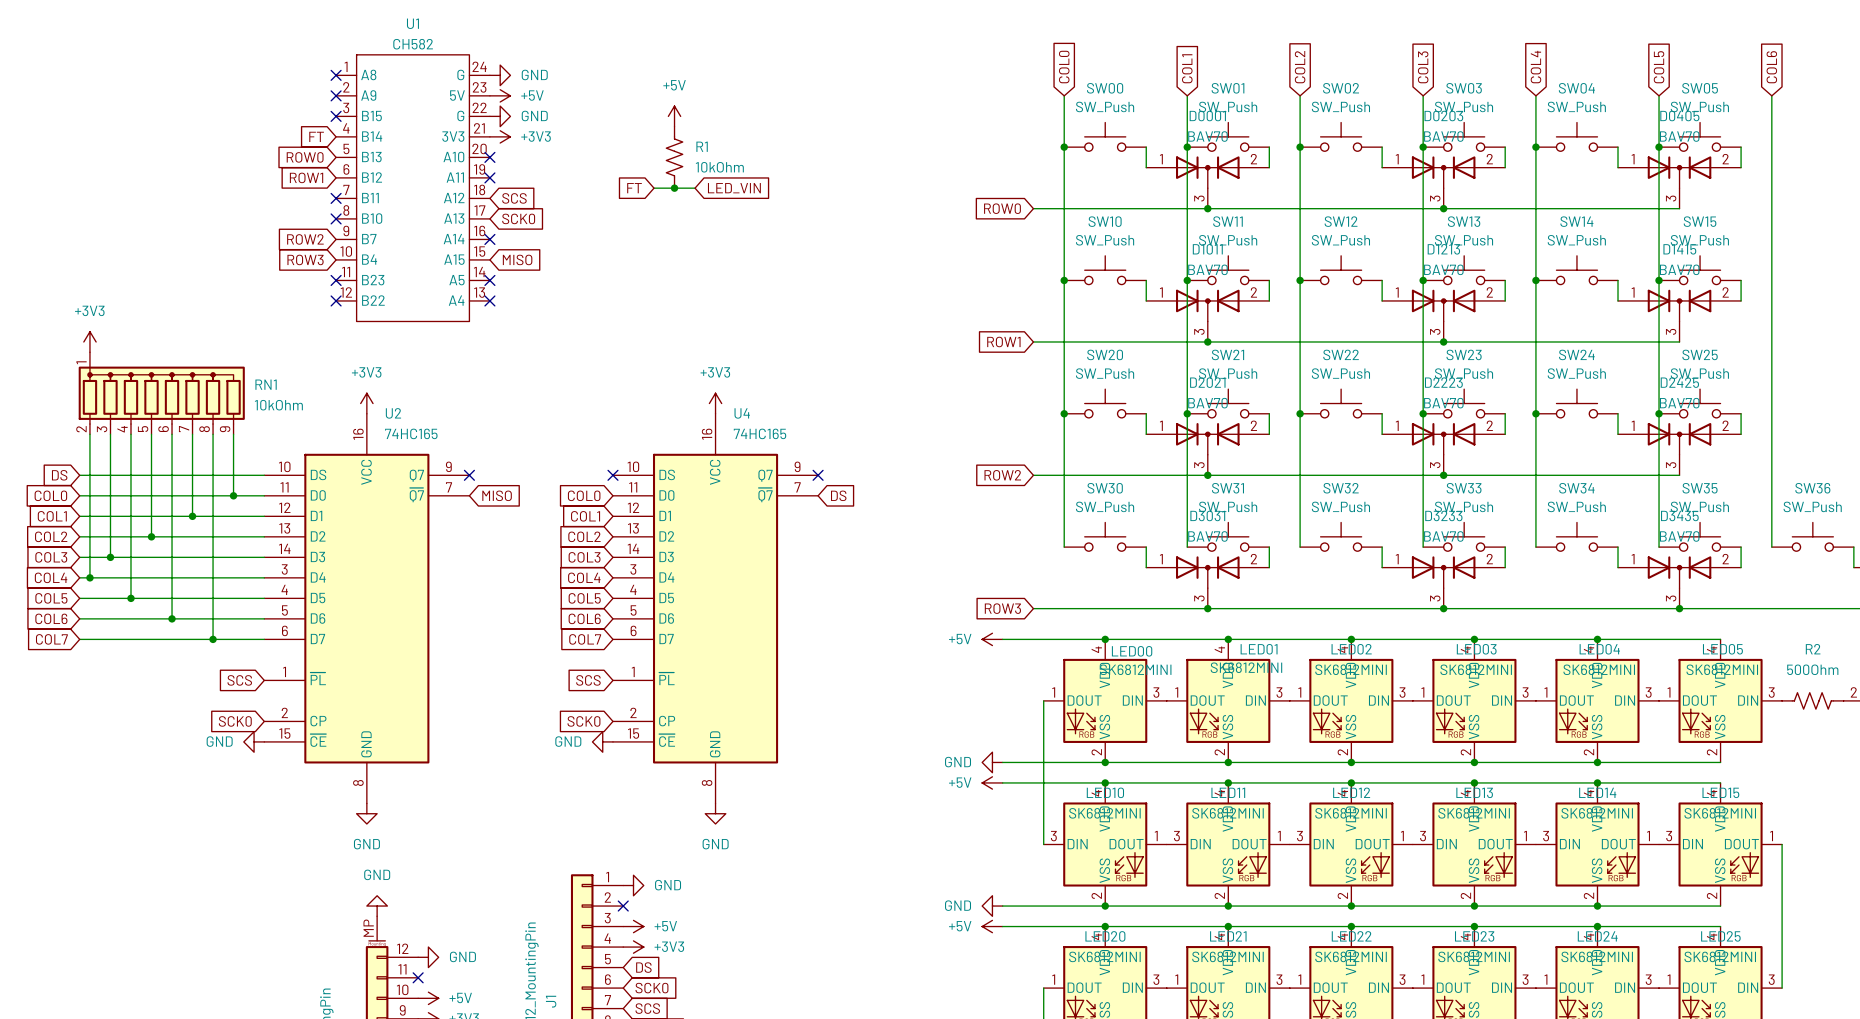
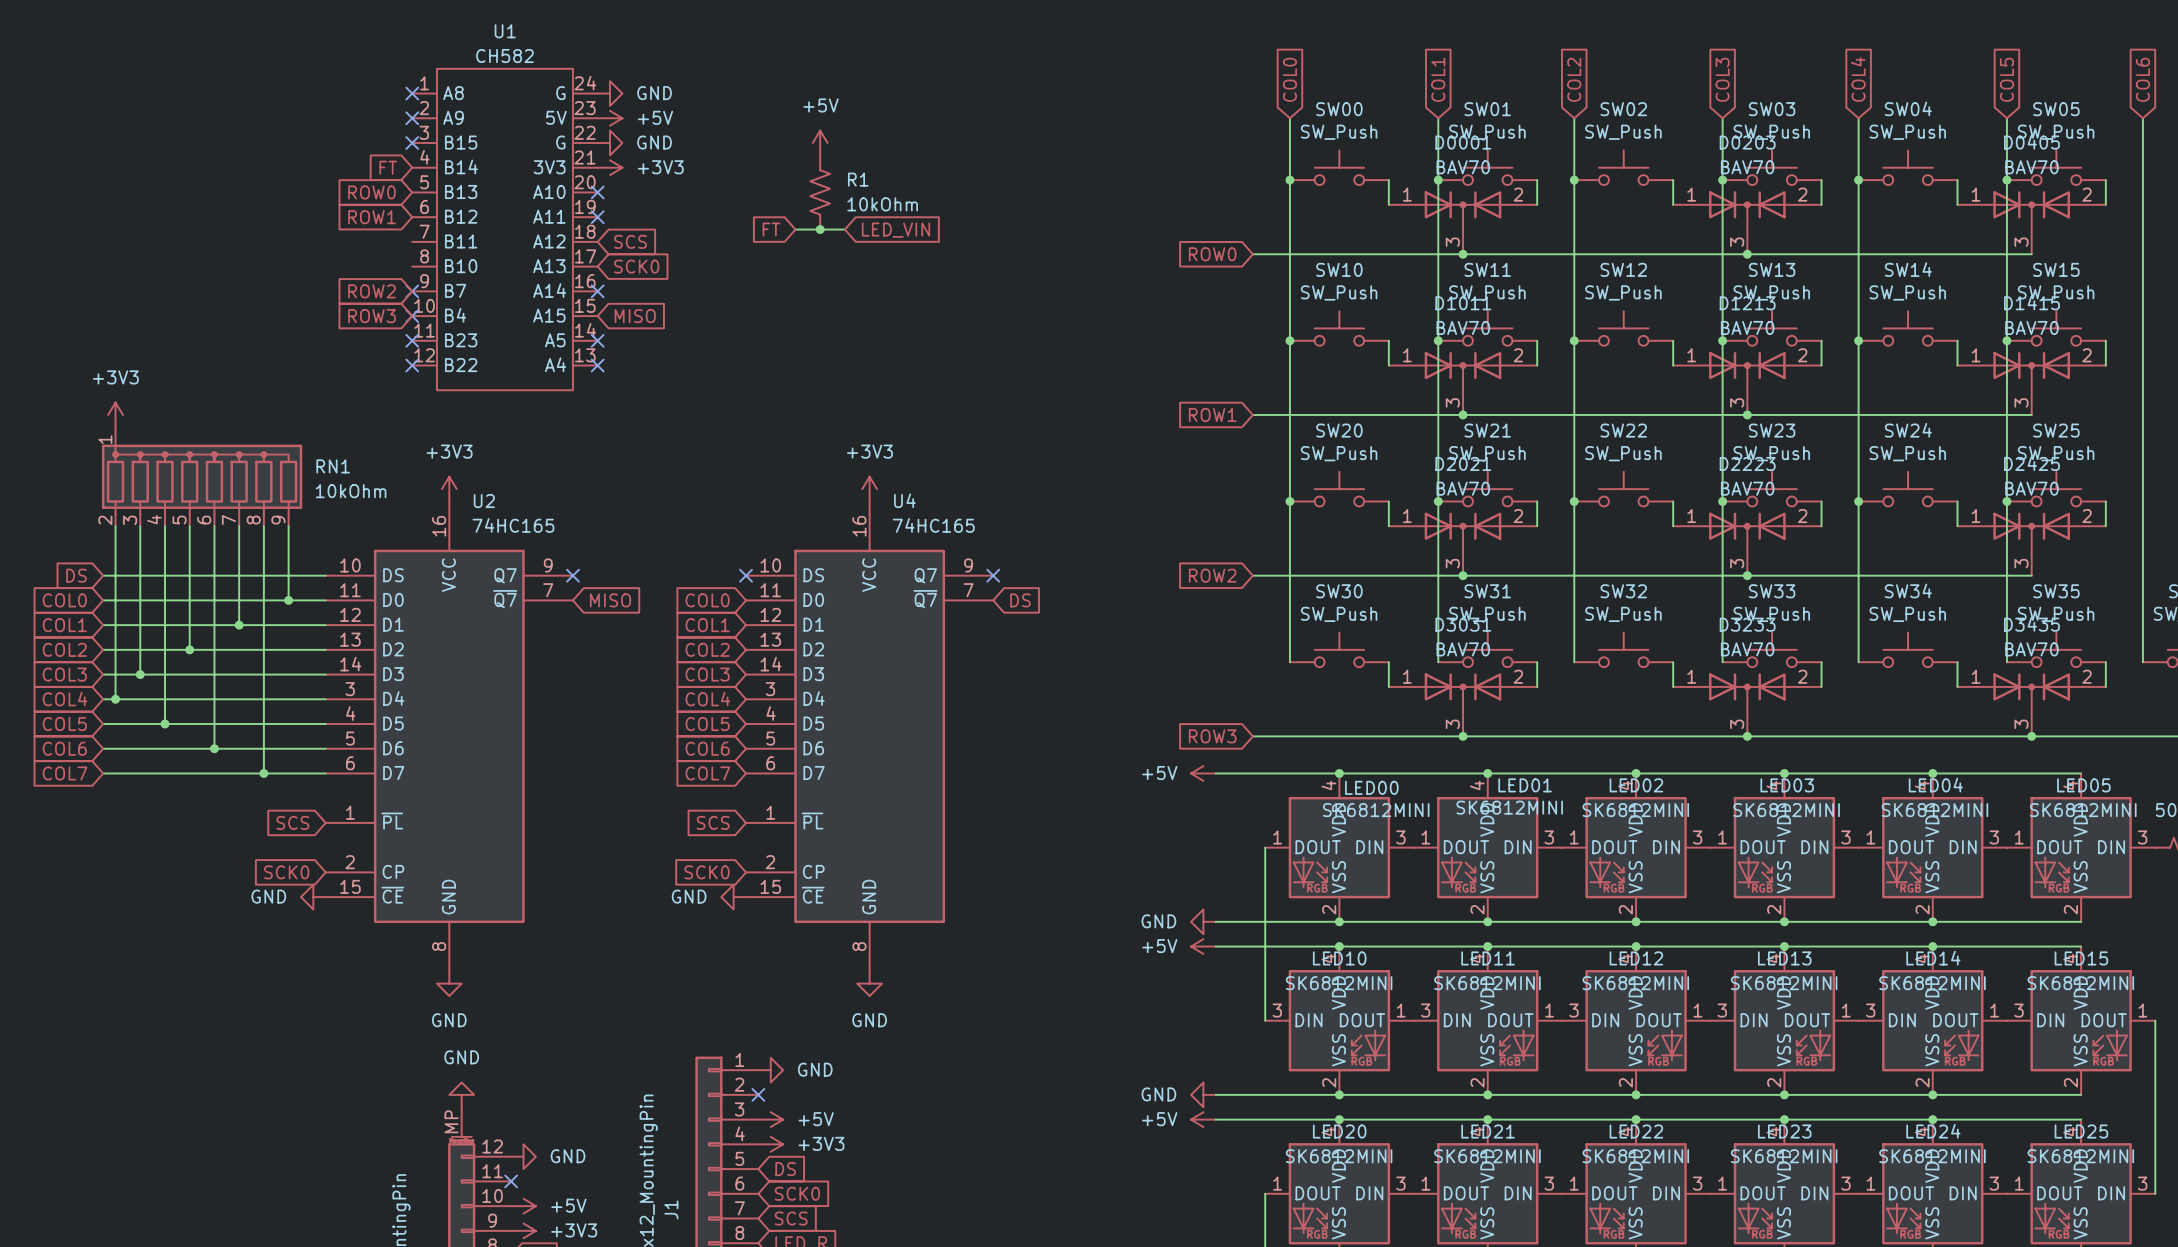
no-connect mark: (336, 198) -> none
no-connect mark: (336, 218) -> none
no-connect mark: none -> (412, 291)
no-connect mark: none -> (412, 316)

